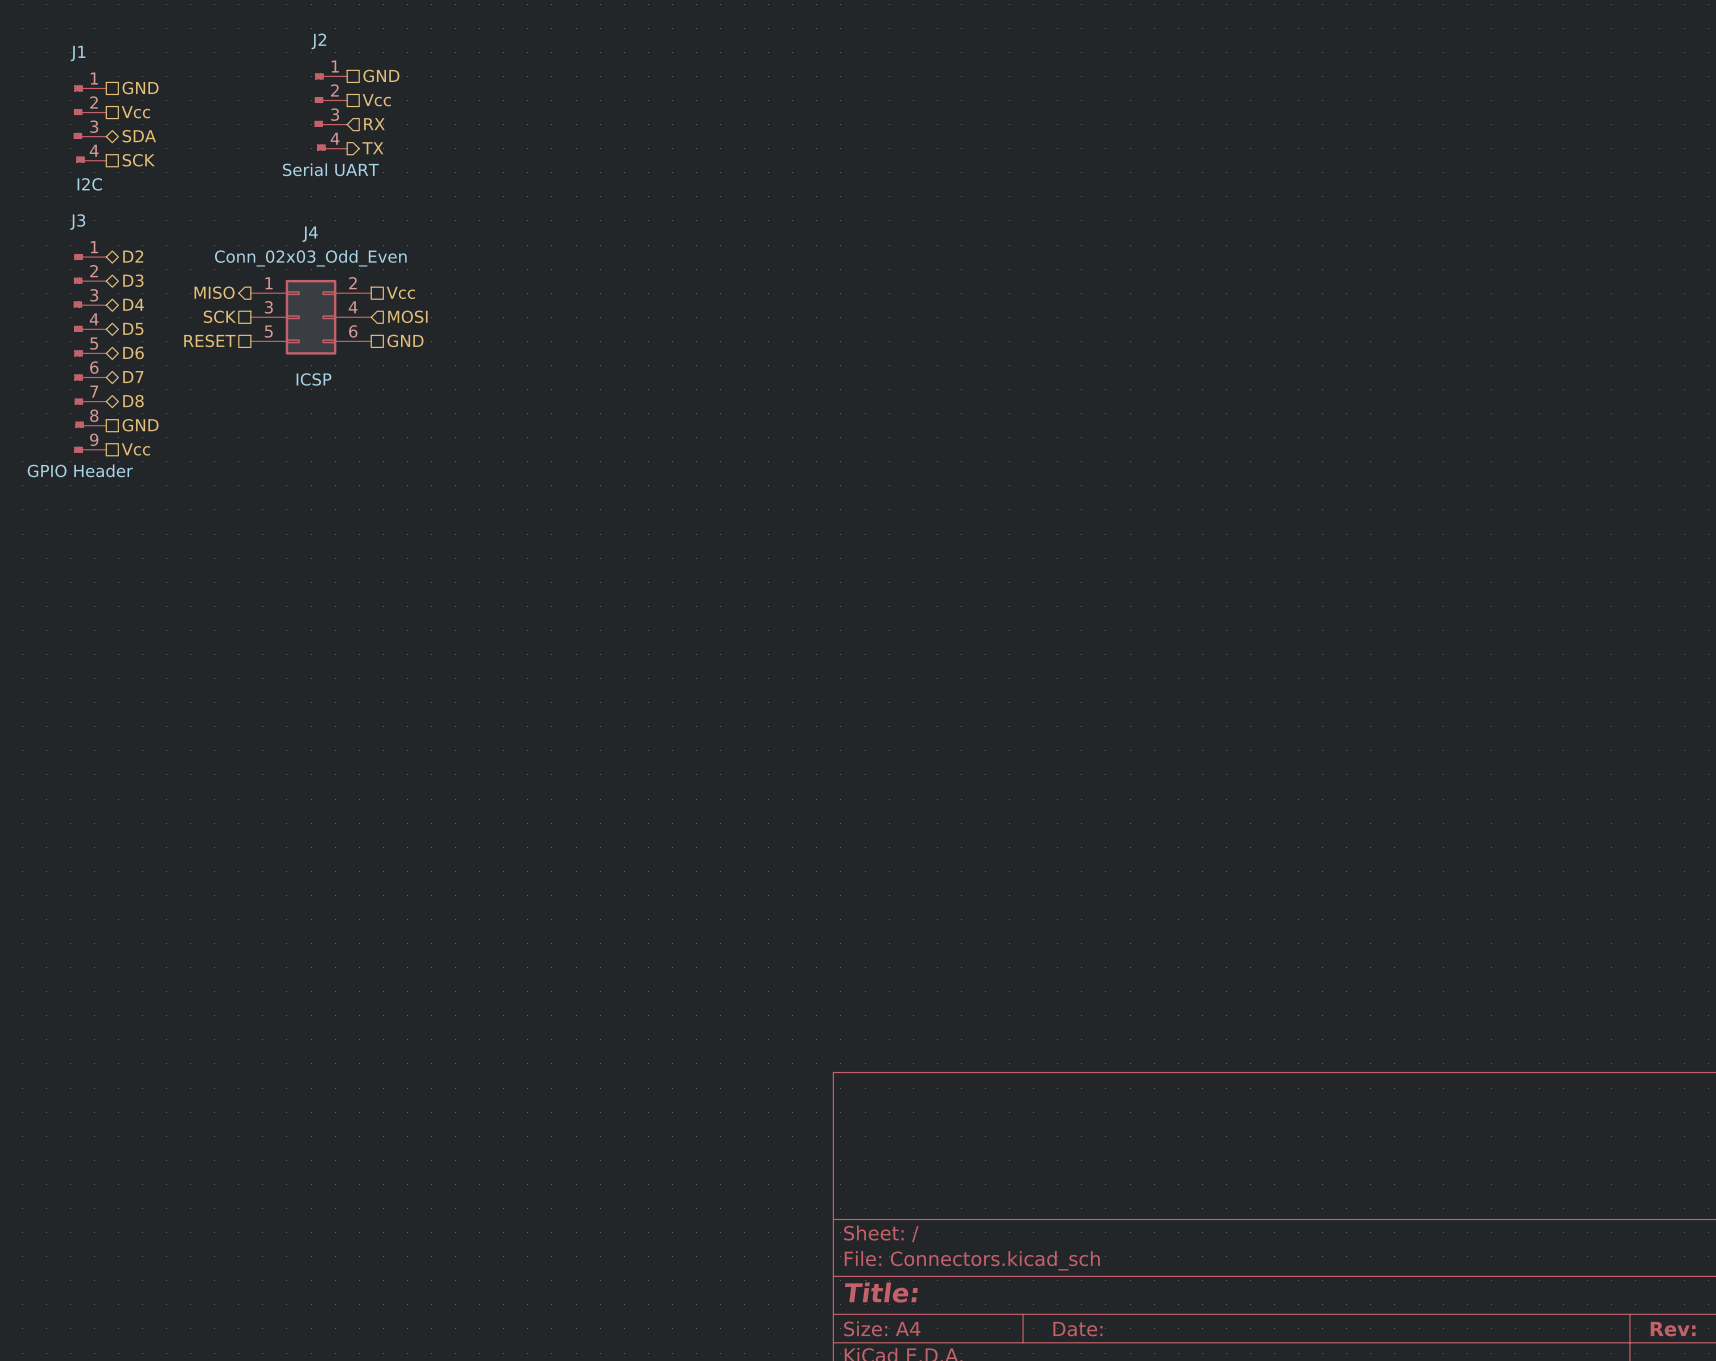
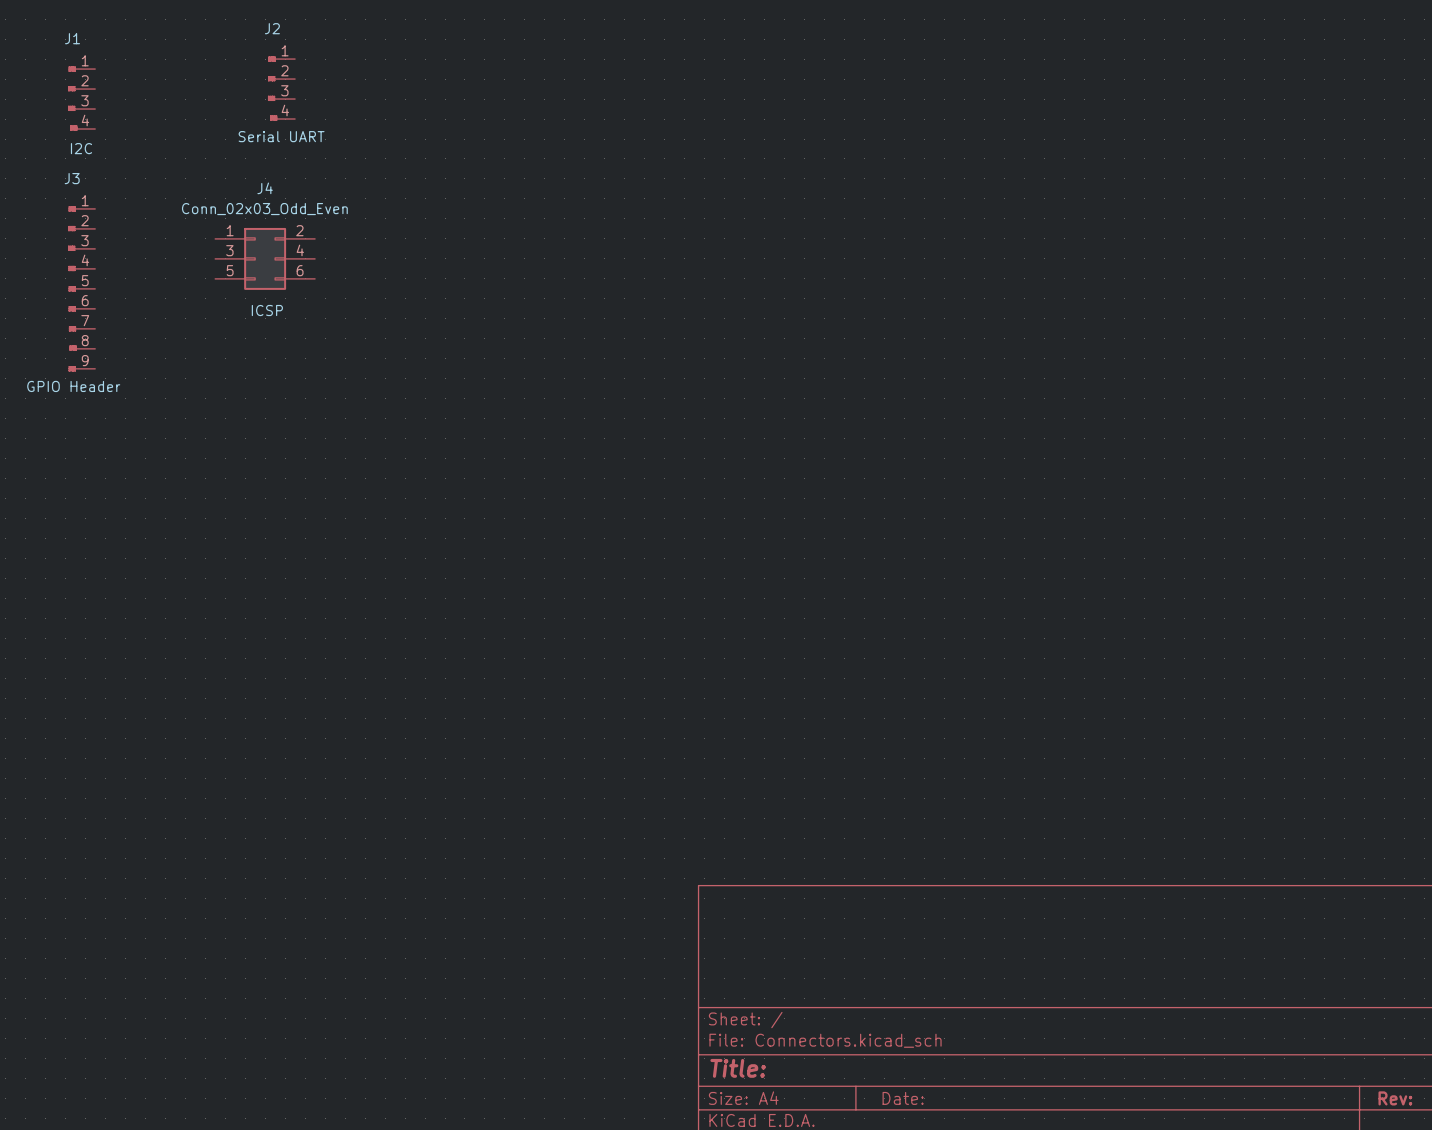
hierarchical label: GND (381, 75) -> none
hierarchical label: GND (140, 88) -> none
hierarchical label: Vcc (376, 100) -> none
hierarchical label: Vcc (135, 112) -> none
hierarchical label: RX (374, 124) -> none
hierarchical label: SDA (139, 136) -> none
hierarchical label: TX (372, 148) -> none
hierarchical label: SCK (138, 160) -> none
hierarchical label: D2 (133, 256) -> none
hierarchical label: D3 (133, 280) -> none
hierarchical label: MISO (214, 292) -> none
hierarchical label: Vcc (400, 292) -> none
hierarchical label: D4 (133, 304) -> none
hierarchical label: SCK (219, 316) -> none
hierarchical label: MOSI (407, 316) -> none
hierarchical label: D5 (133, 328) -> none
hierarchical label: RESET (209, 340) -> none
hierarchical label: GND (405, 340) -> none
hierarchical label: D6 (133, 352) -> none
hierarchical label: D7 (133, 377) -> none
hierarchical label: D8 (133, 401) -> none
hierarchical label: GND (140, 425) -> none
hierarchical label: Vcc (135, 449) -> none

